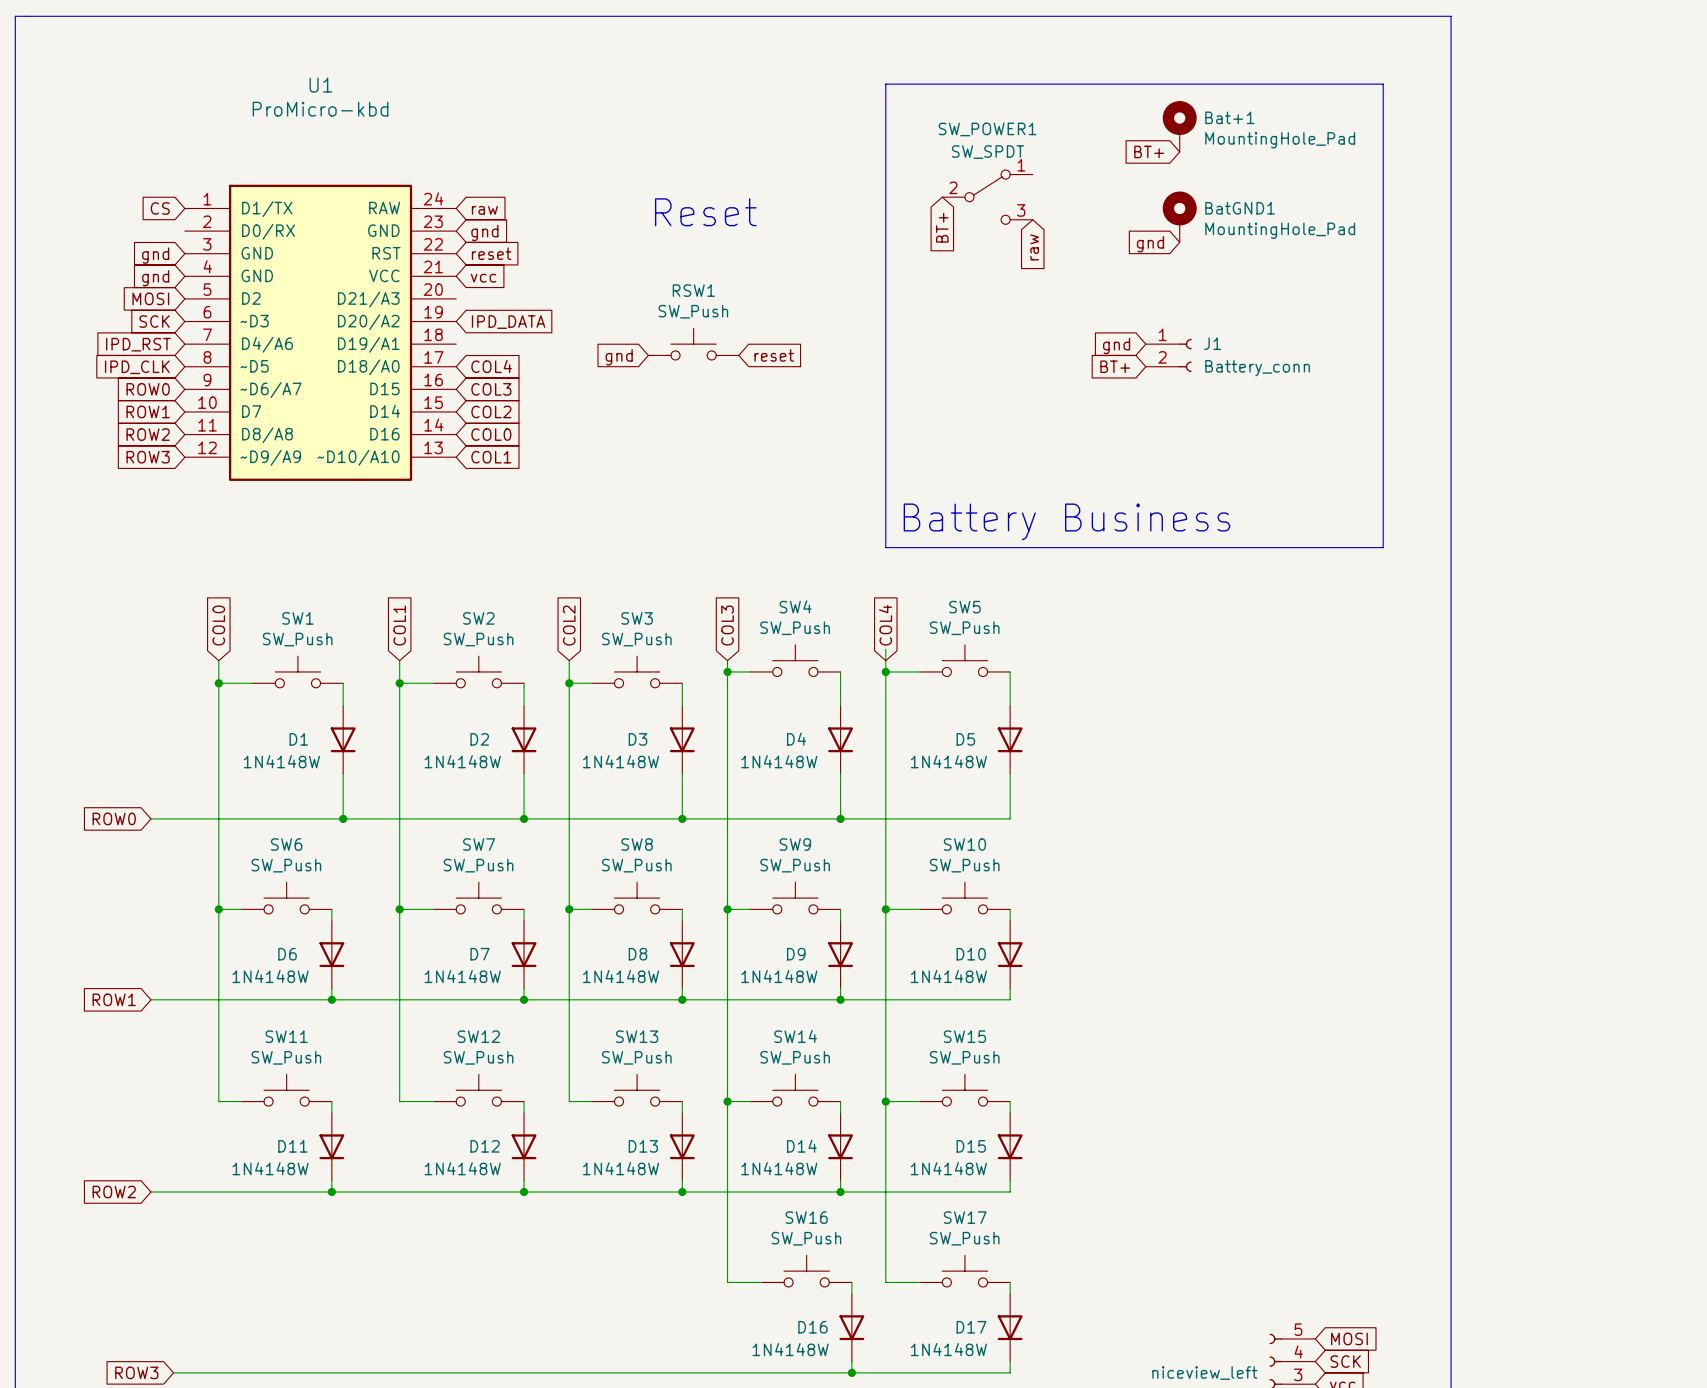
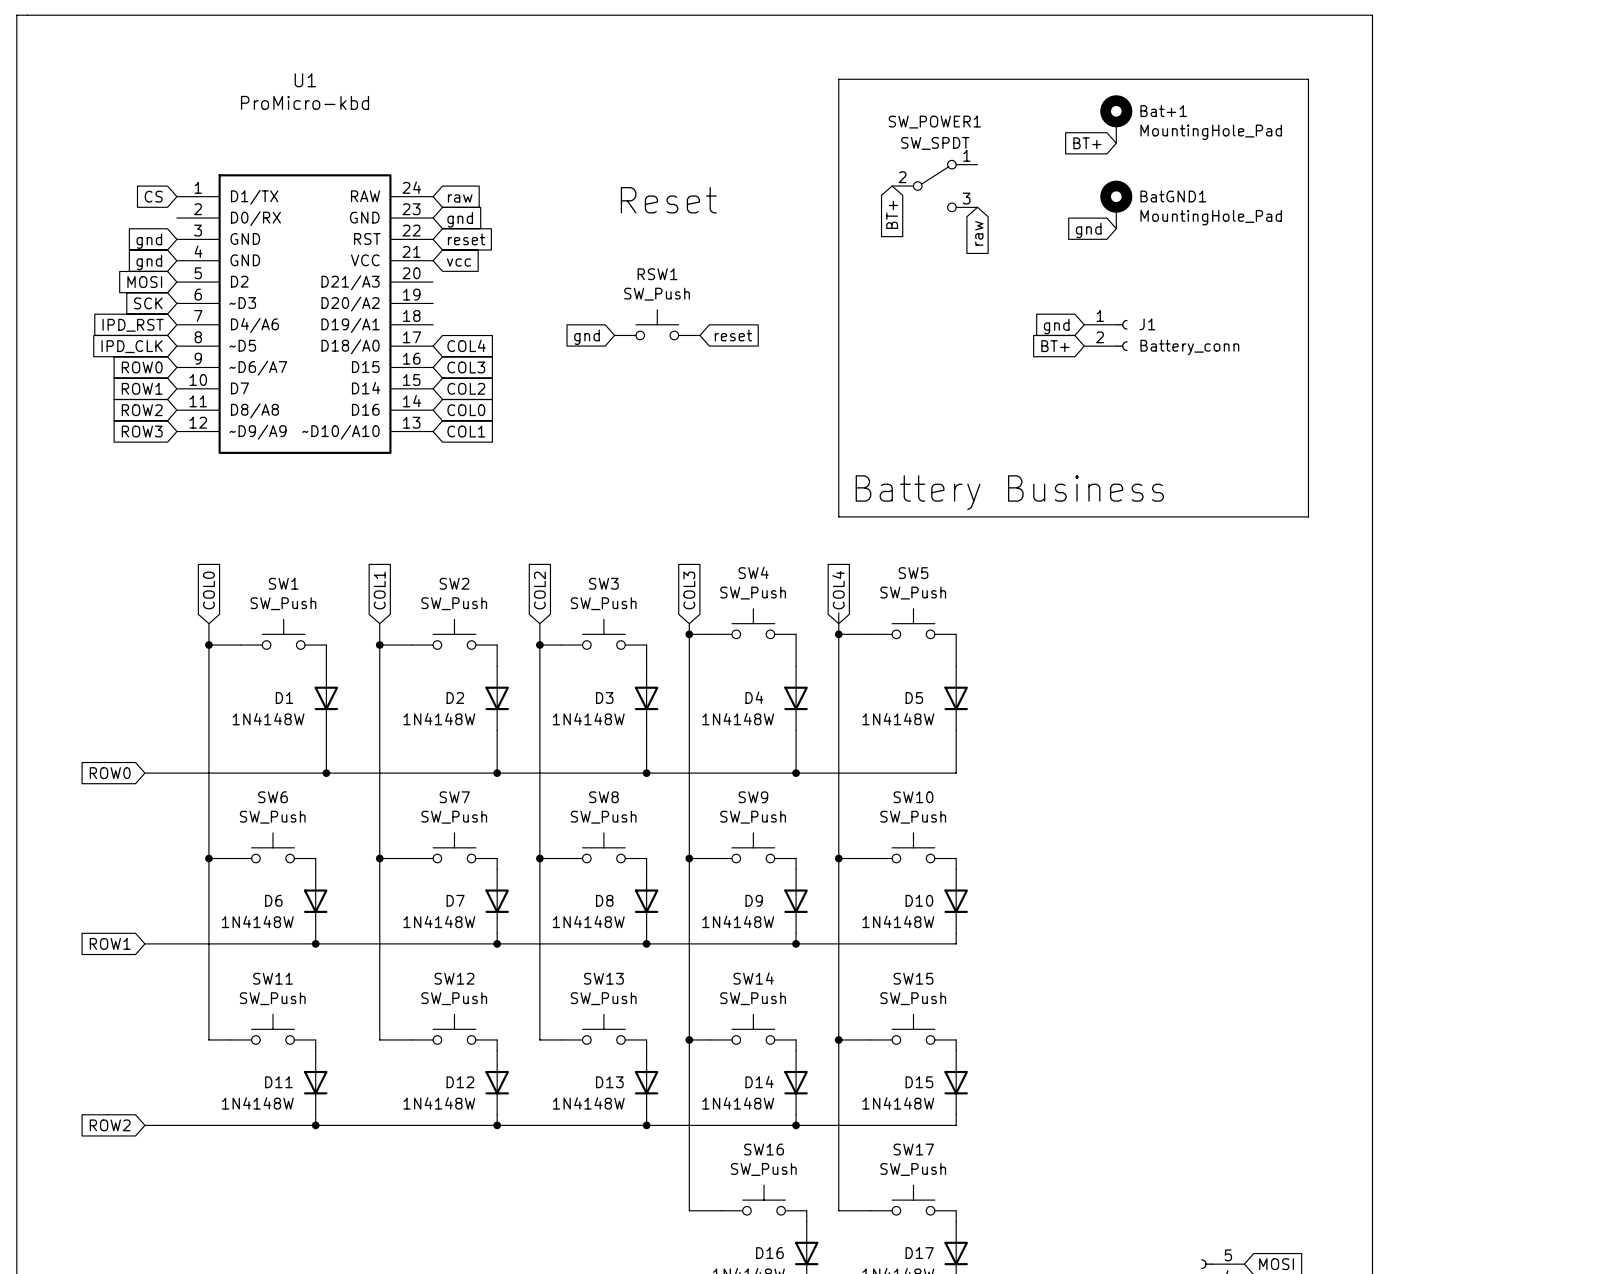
global label: IPD_DATA (508, 322) -> none

